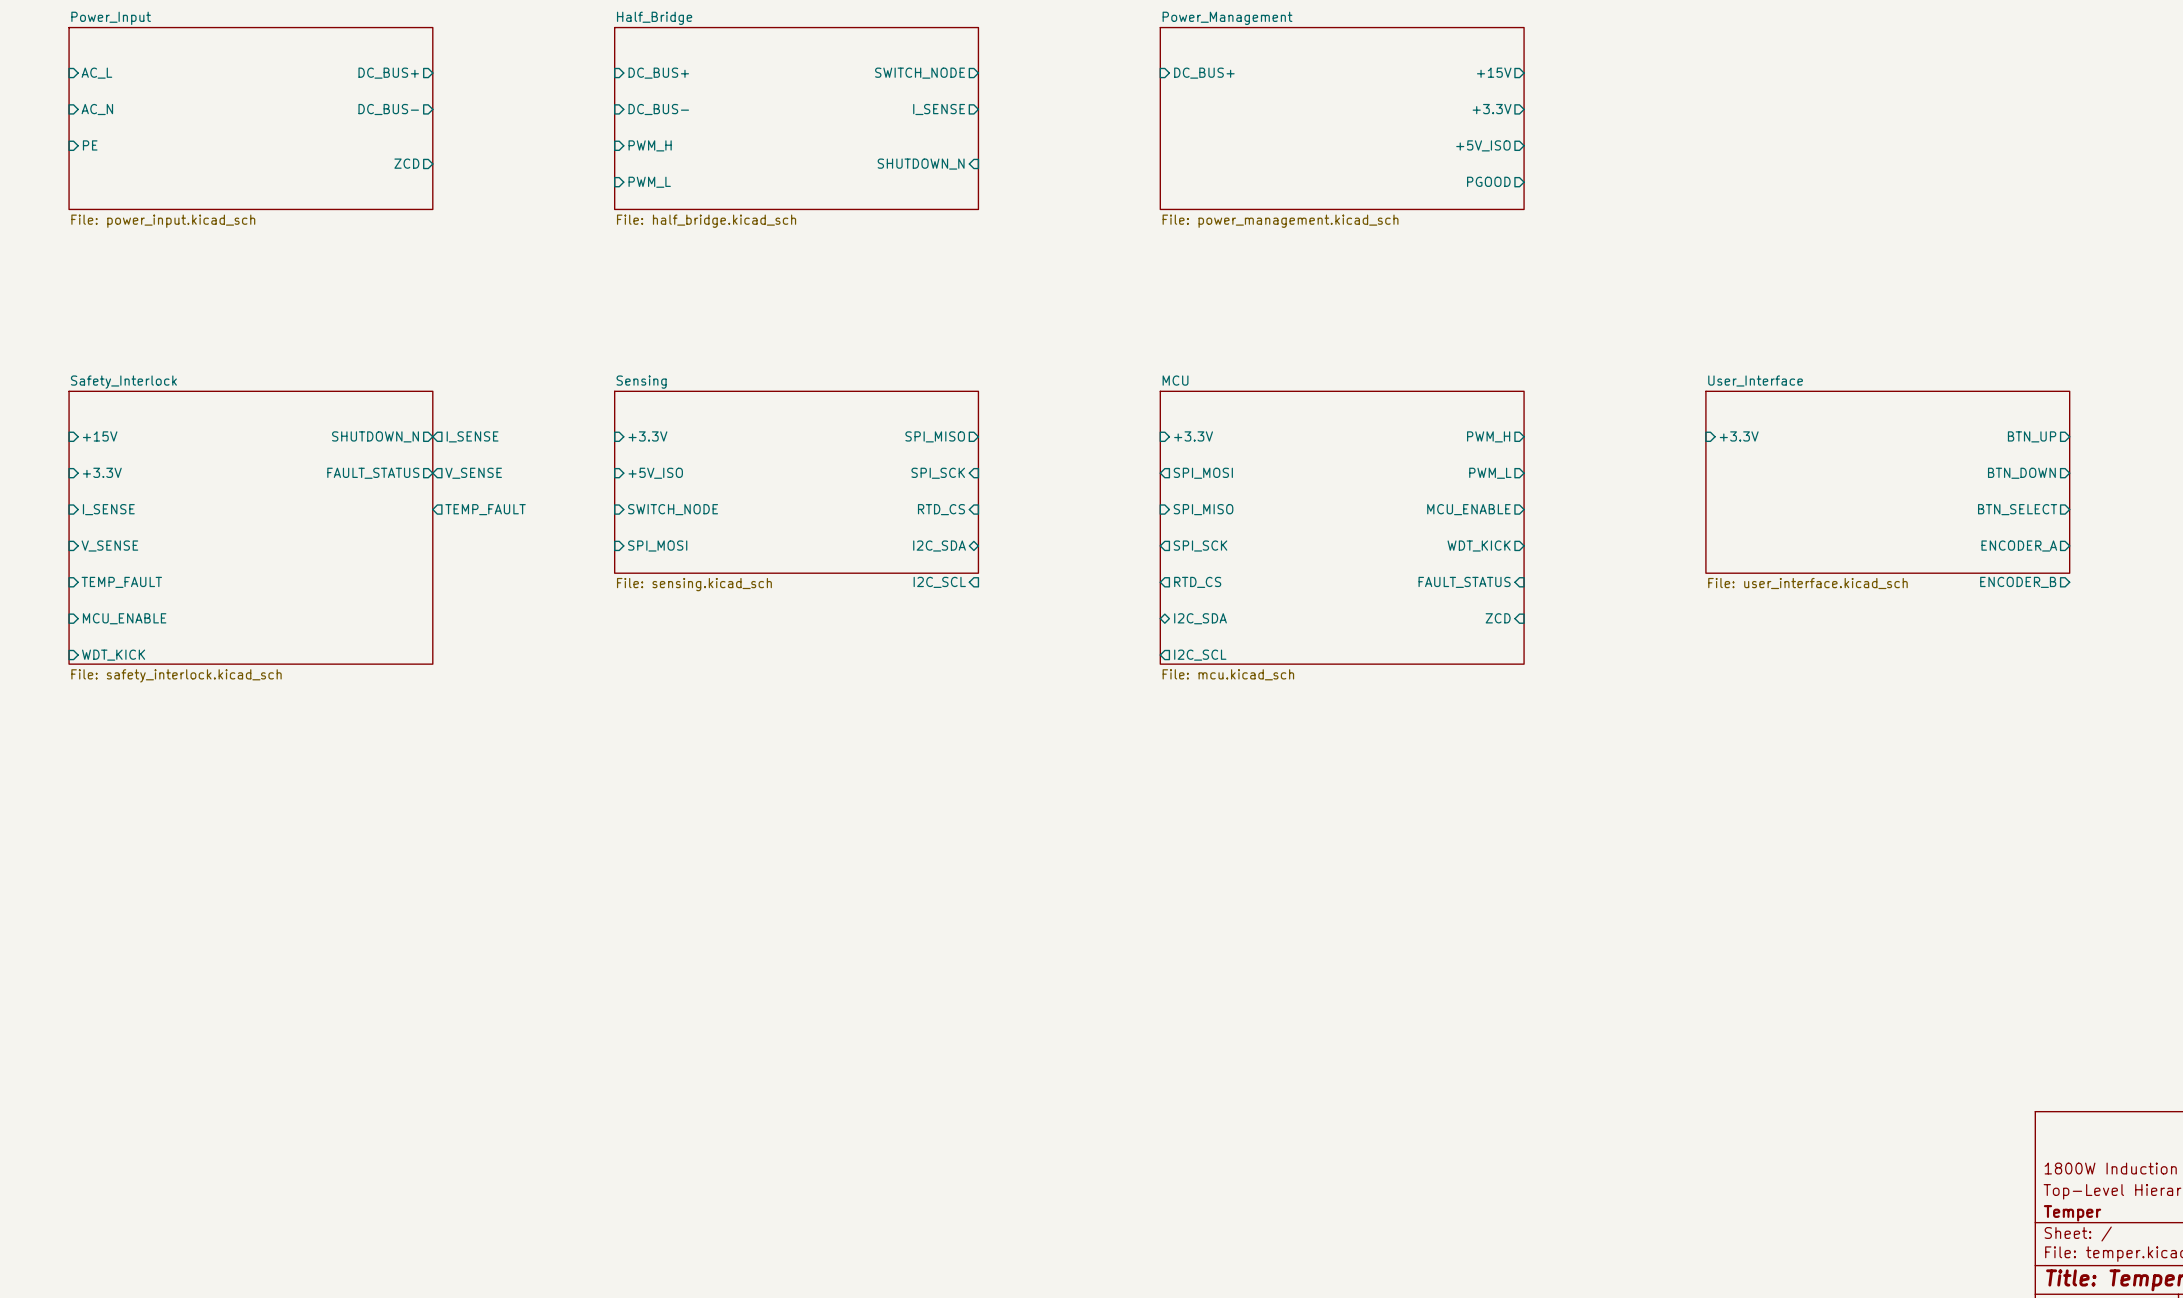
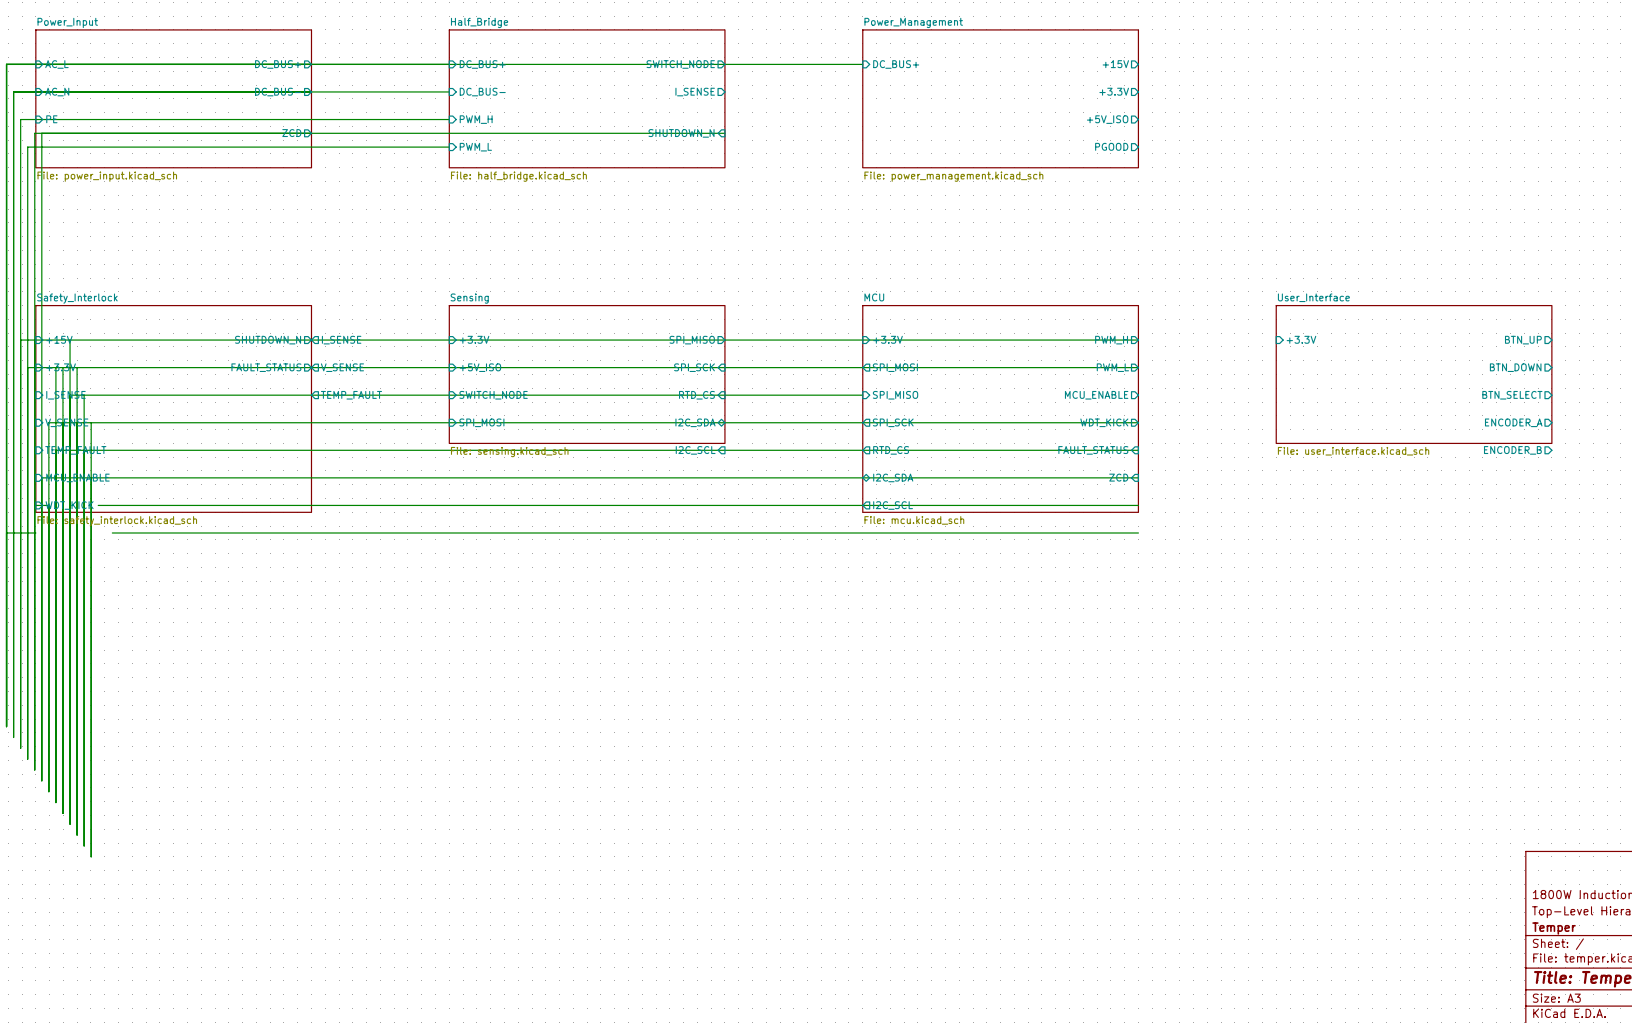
wire: none -> (862, 64) (6, 64) (6, 726)
wire: none -> (449, 91) (13, 91) (13, 737)
wire: none -> (449, 119) (20, 119) (20, 748)
wire: none -> (41, 133) (41, 780)
wire: none -> (724, 133) (34, 133) (34, 770)
wire: none -> (449, 147) (27, 147) (27, 759)
wire: none -> (20, 340) (1138, 340)
wire: none -> (70, 340) (70, 824)
wire: none -> (27, 367) (1138, 367)
wire: none -> (55, 367) (55, 802)
wire: none -> (62, 367) (62, 813)
wire: none -> (77, 367) (77, 835)
wire: none -> (70, 395) (862, 395)
wire: none -> (84, 395) (84, 846)
wire: none -> (91, 422) (91, 856)
wire: none -> (1138, 422) (48, 422) (48, 791)
wire: none -> (55, 450) (1138, 450)
wire: none -> (41, 477) (1138, 477)
wire: none -> (35, 505) (48, 505)
wire: none -> (98, 505) (1138, 505)
wire: none -> (6, 532) (35, 532)
wire: none -> (112, 532) (1138, 532)

